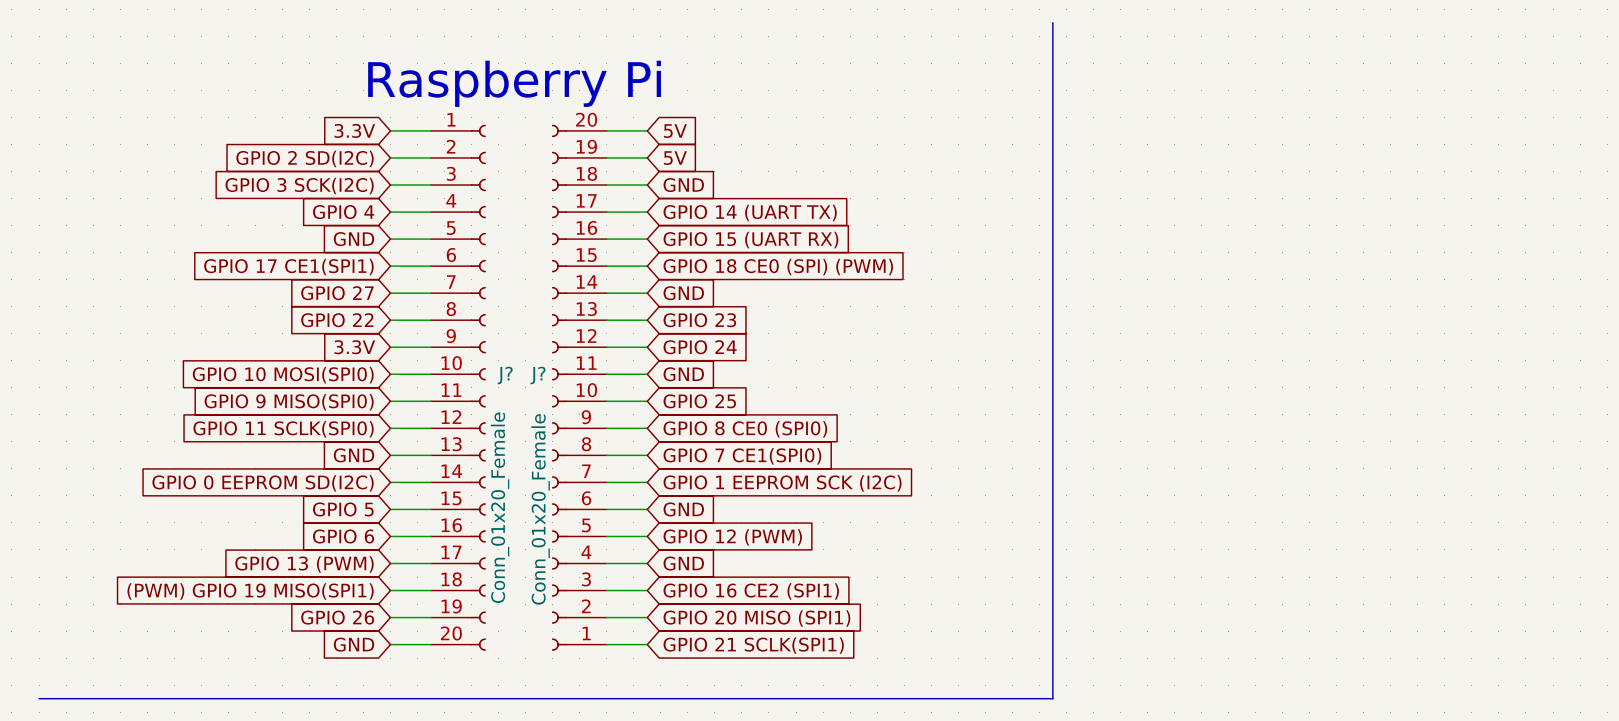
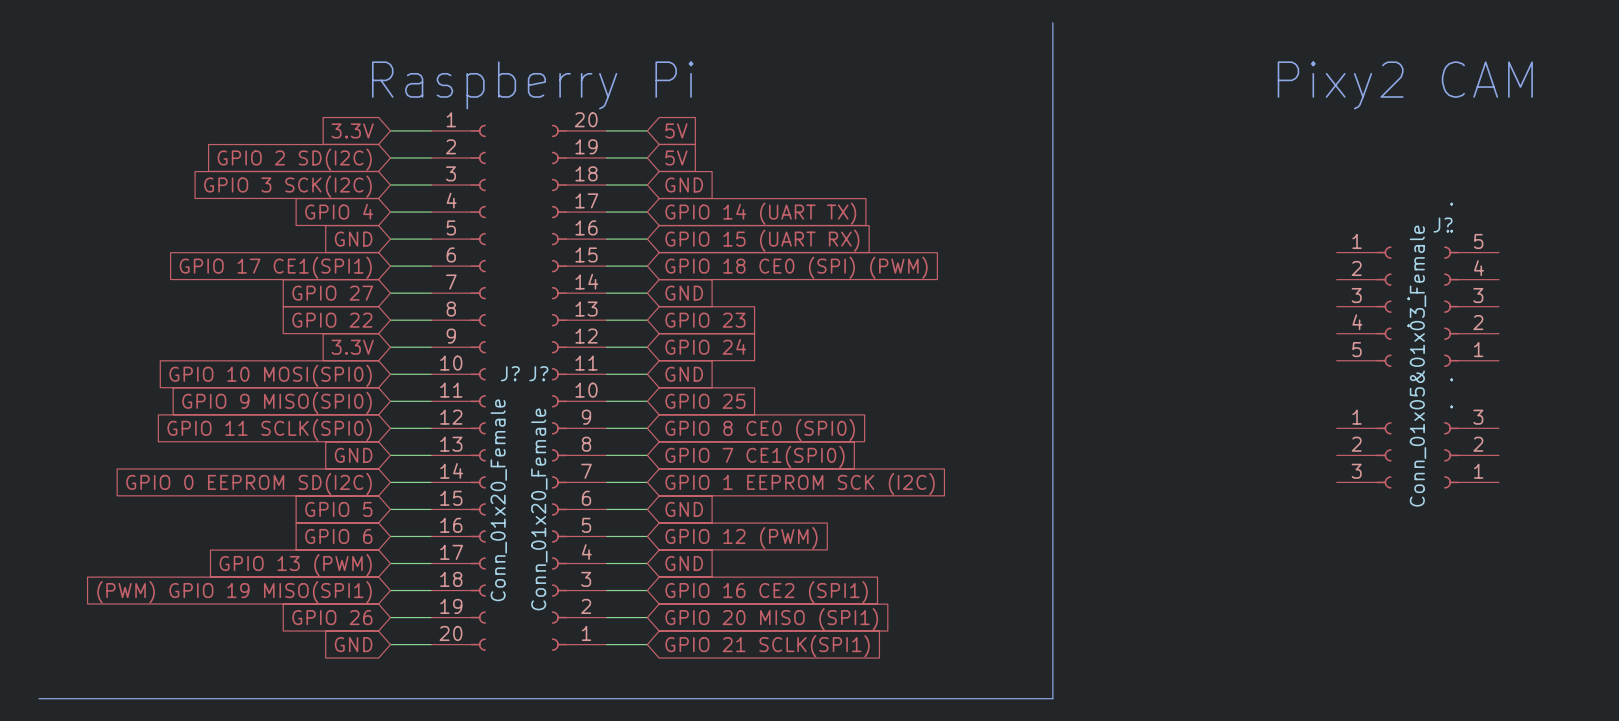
text: none -> Pixy2 CAM (1405, 85)
part: none -> . (1364, 306)
part: none -> . (1471, 306)
J?: none -> Conn_01x05&01x03_Female (1364, 455)
part: none -> . (1471, 455)

